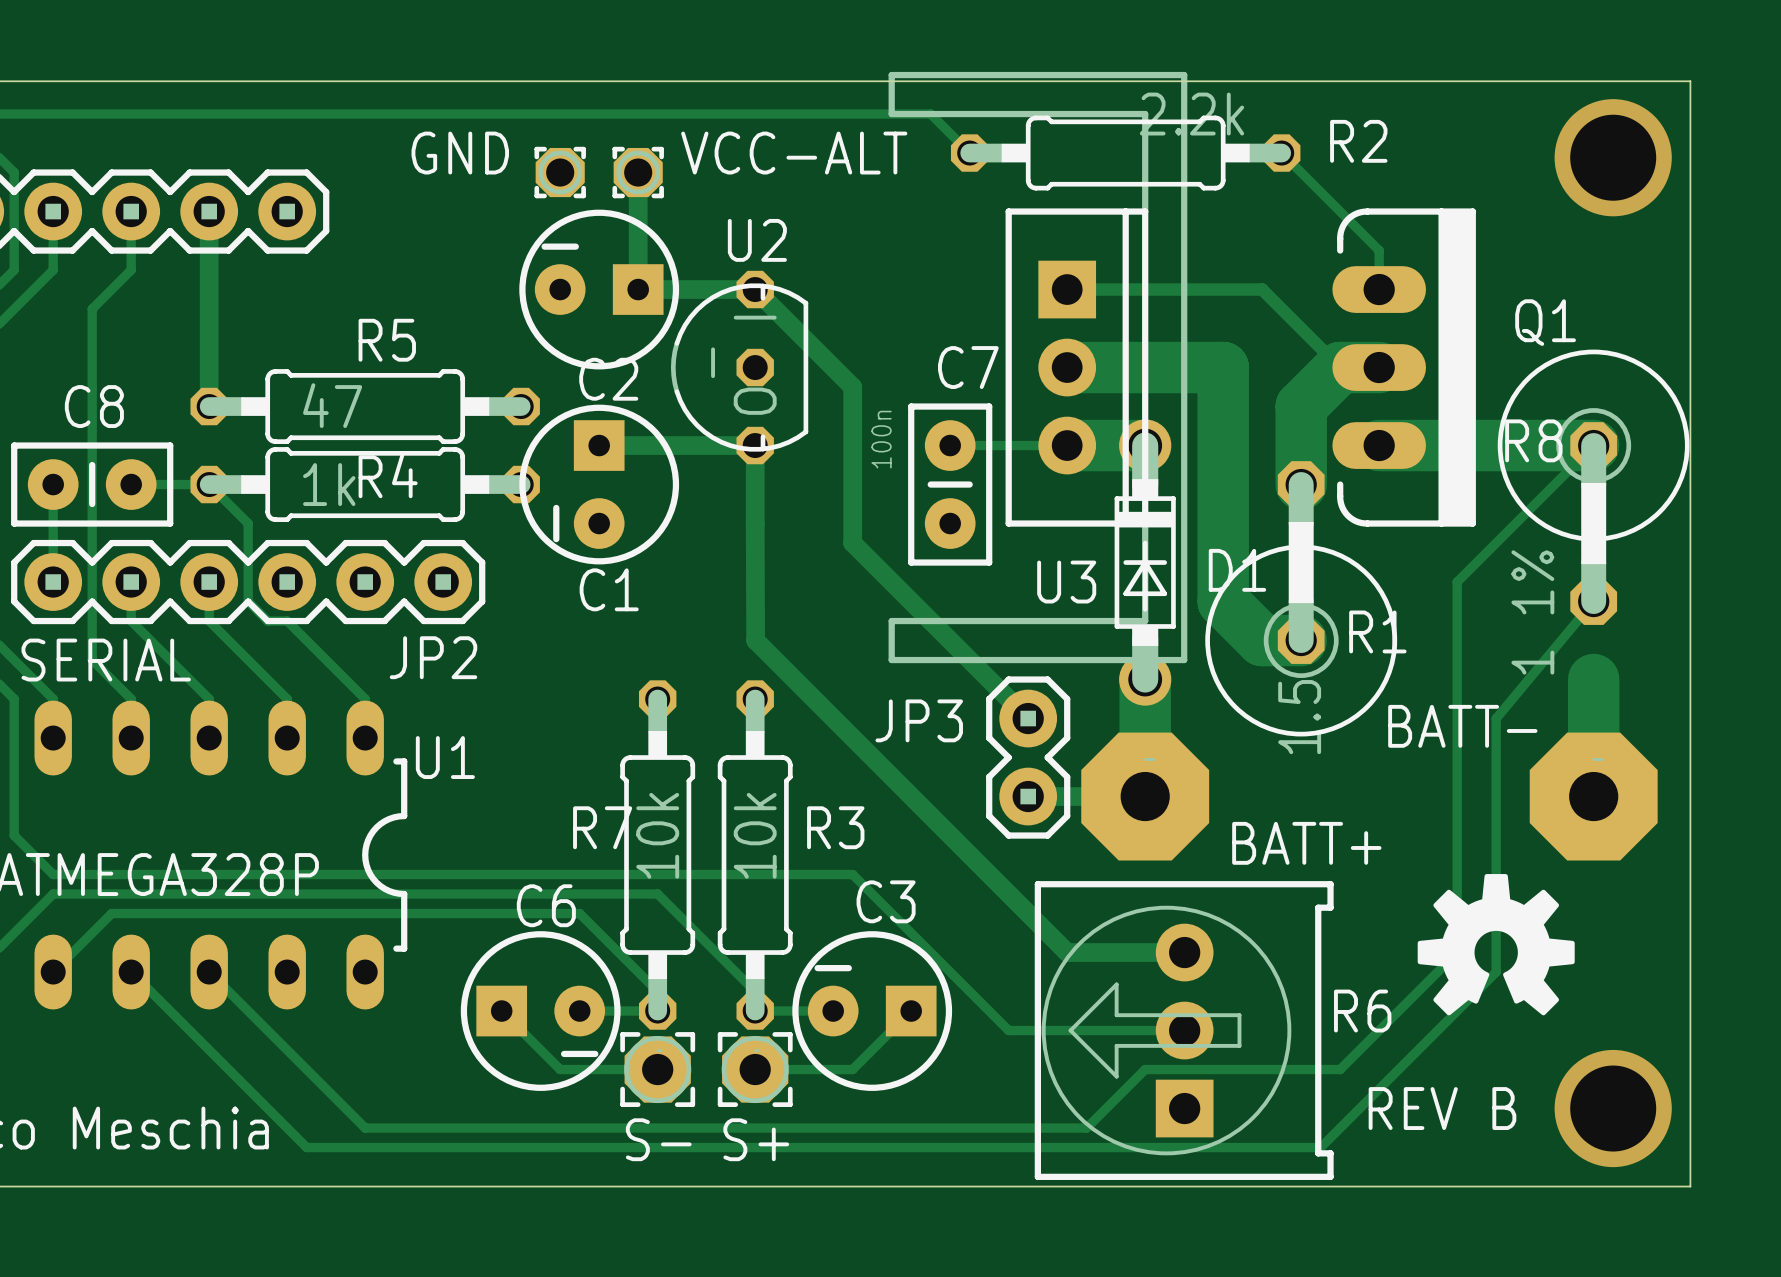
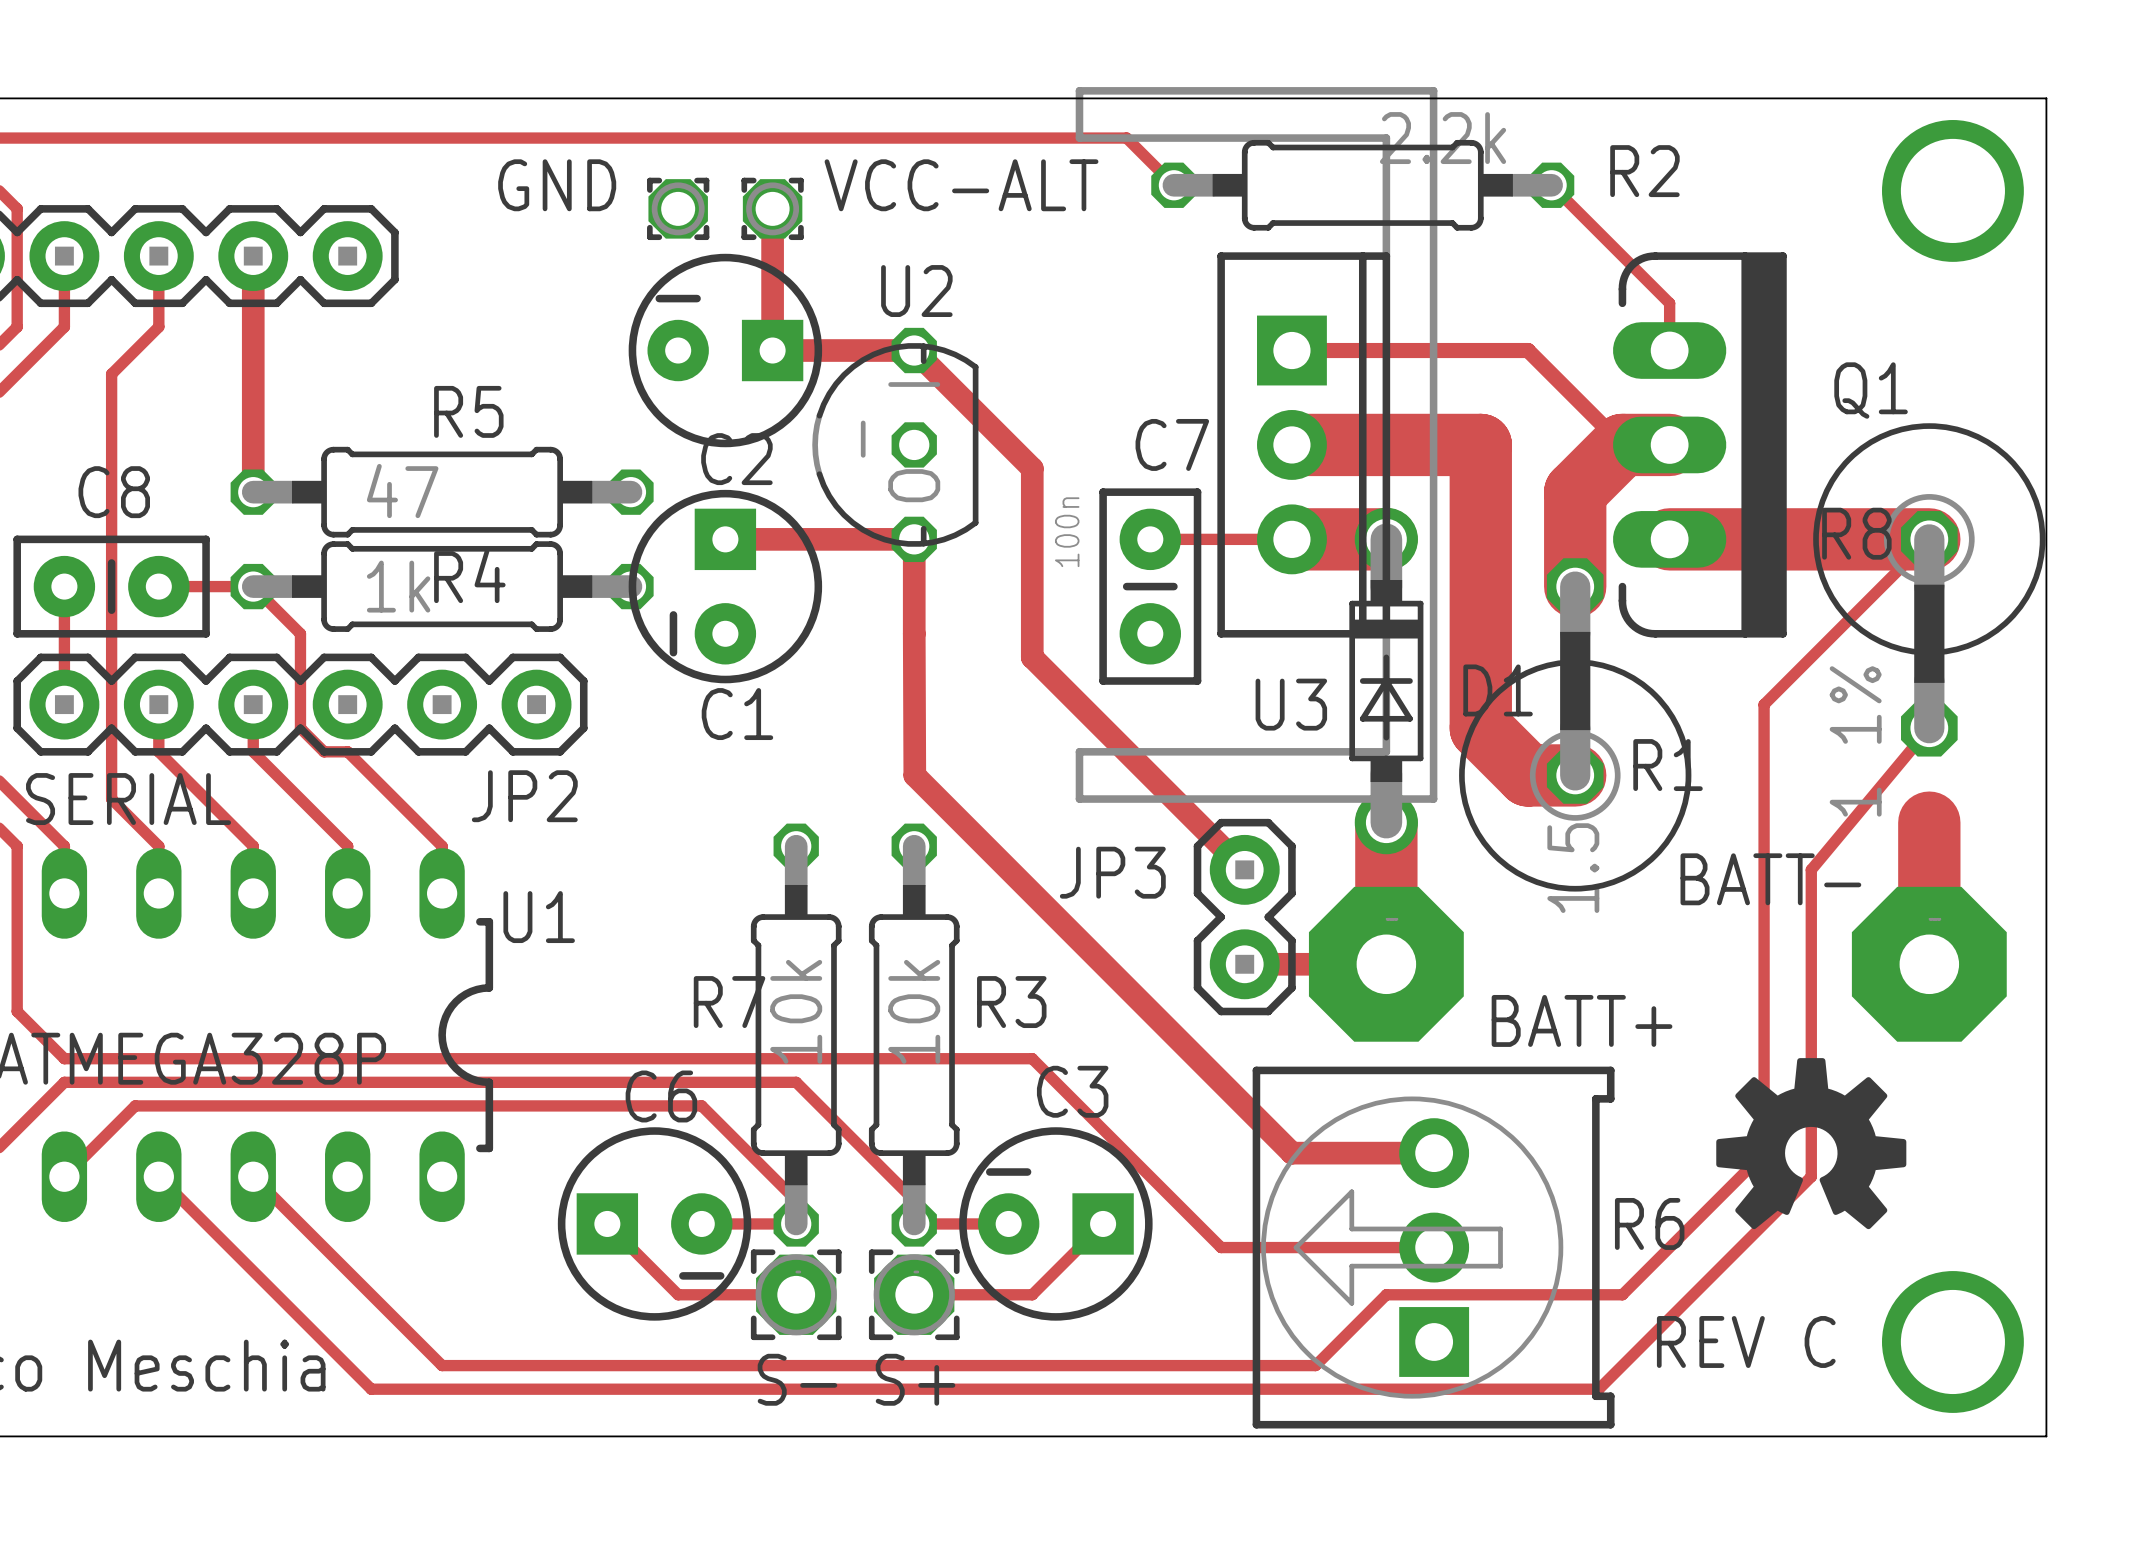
text: REV B (1442, 1108) -> REV C (1746, 1341)

